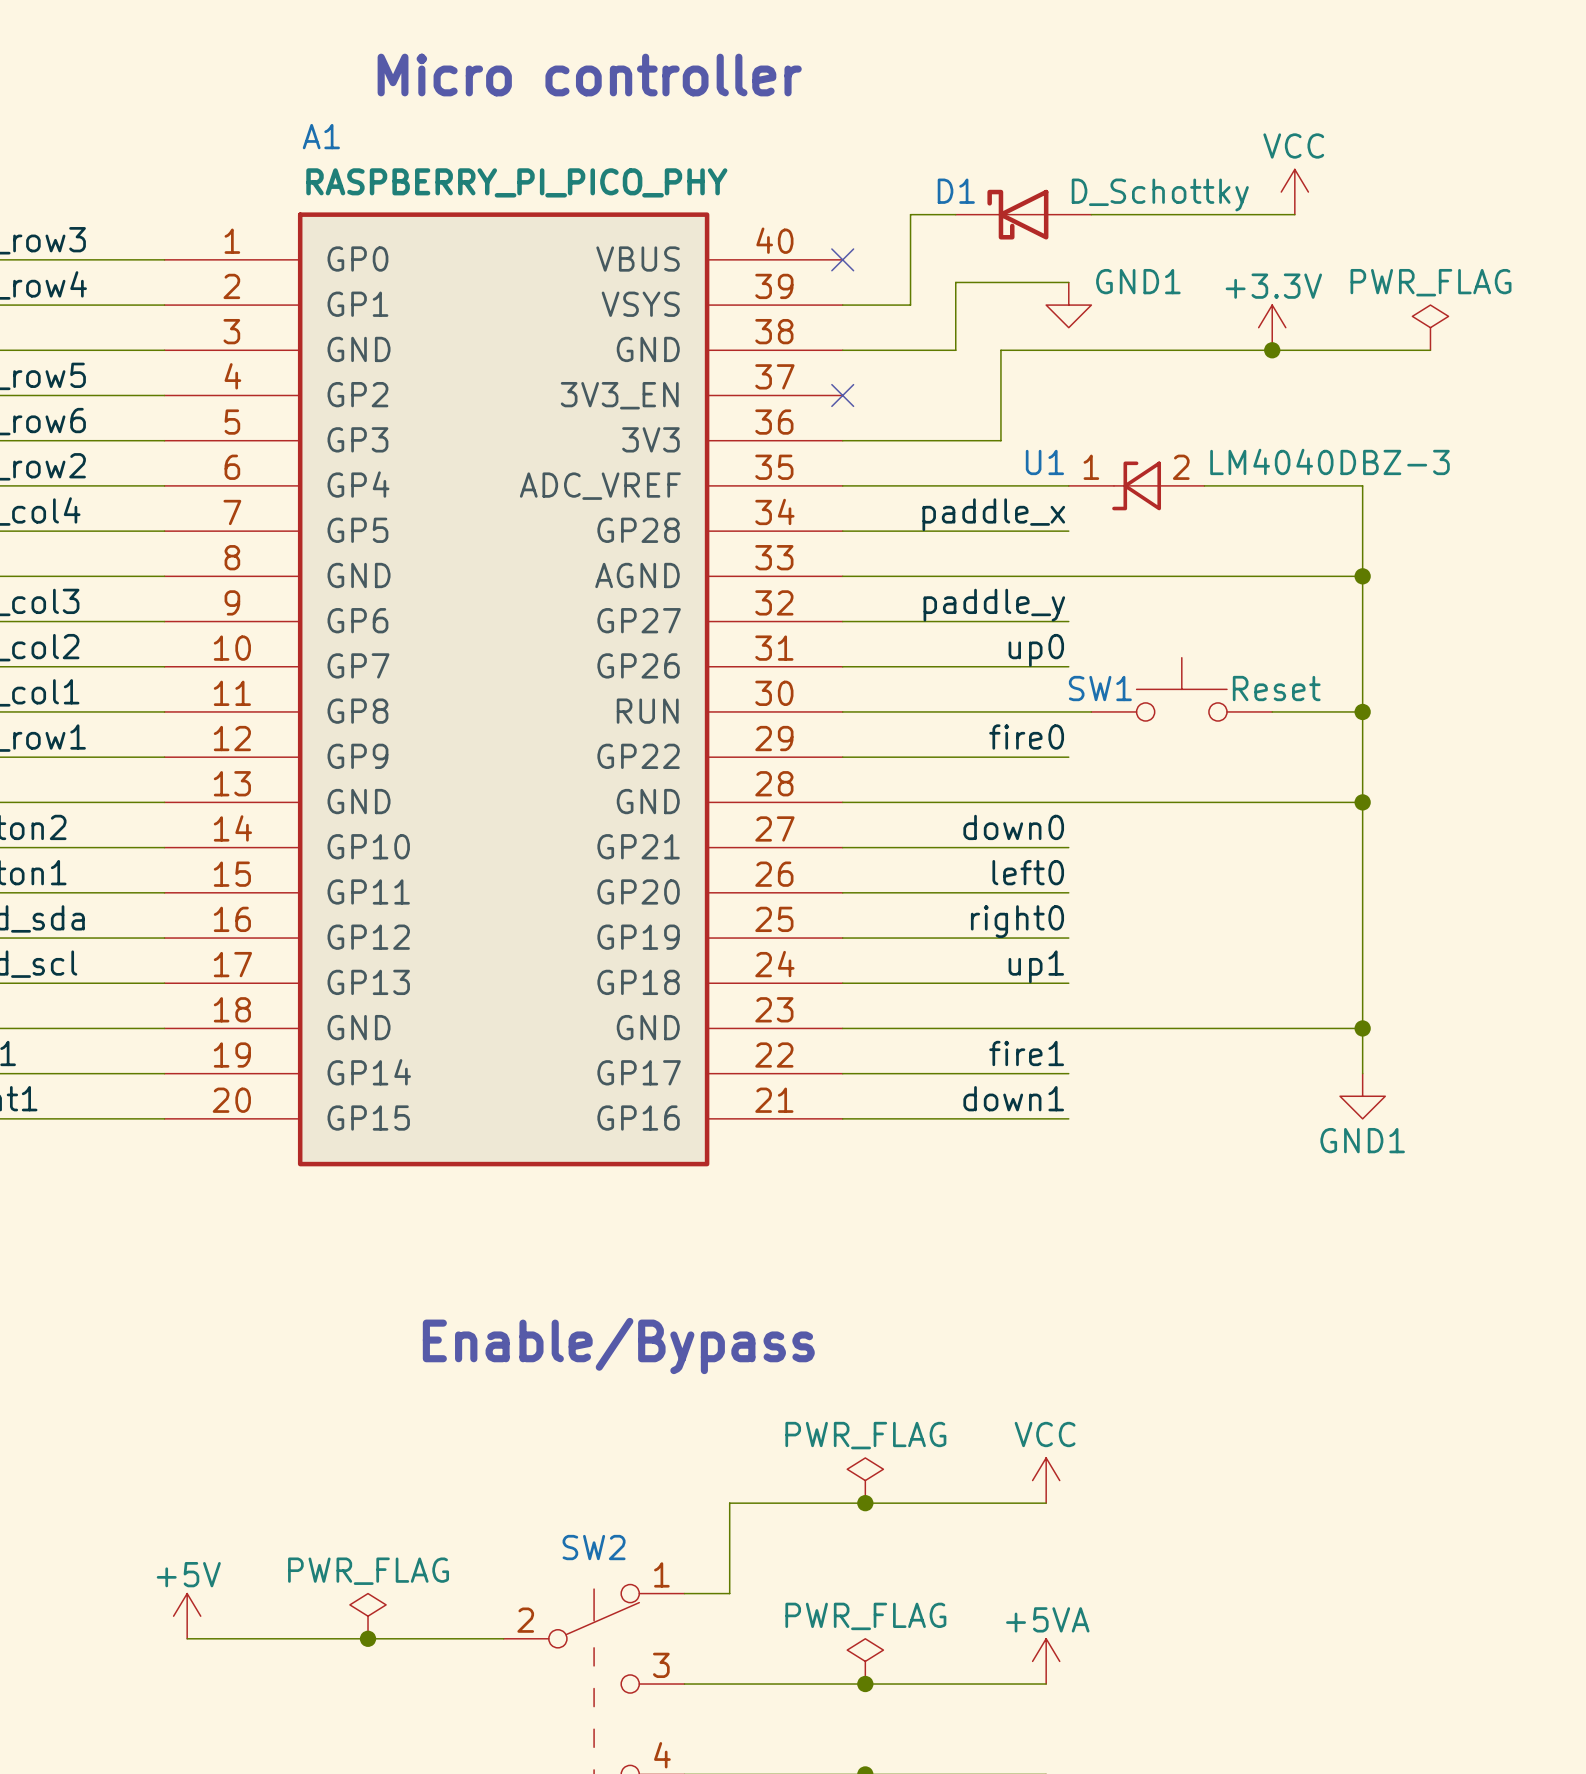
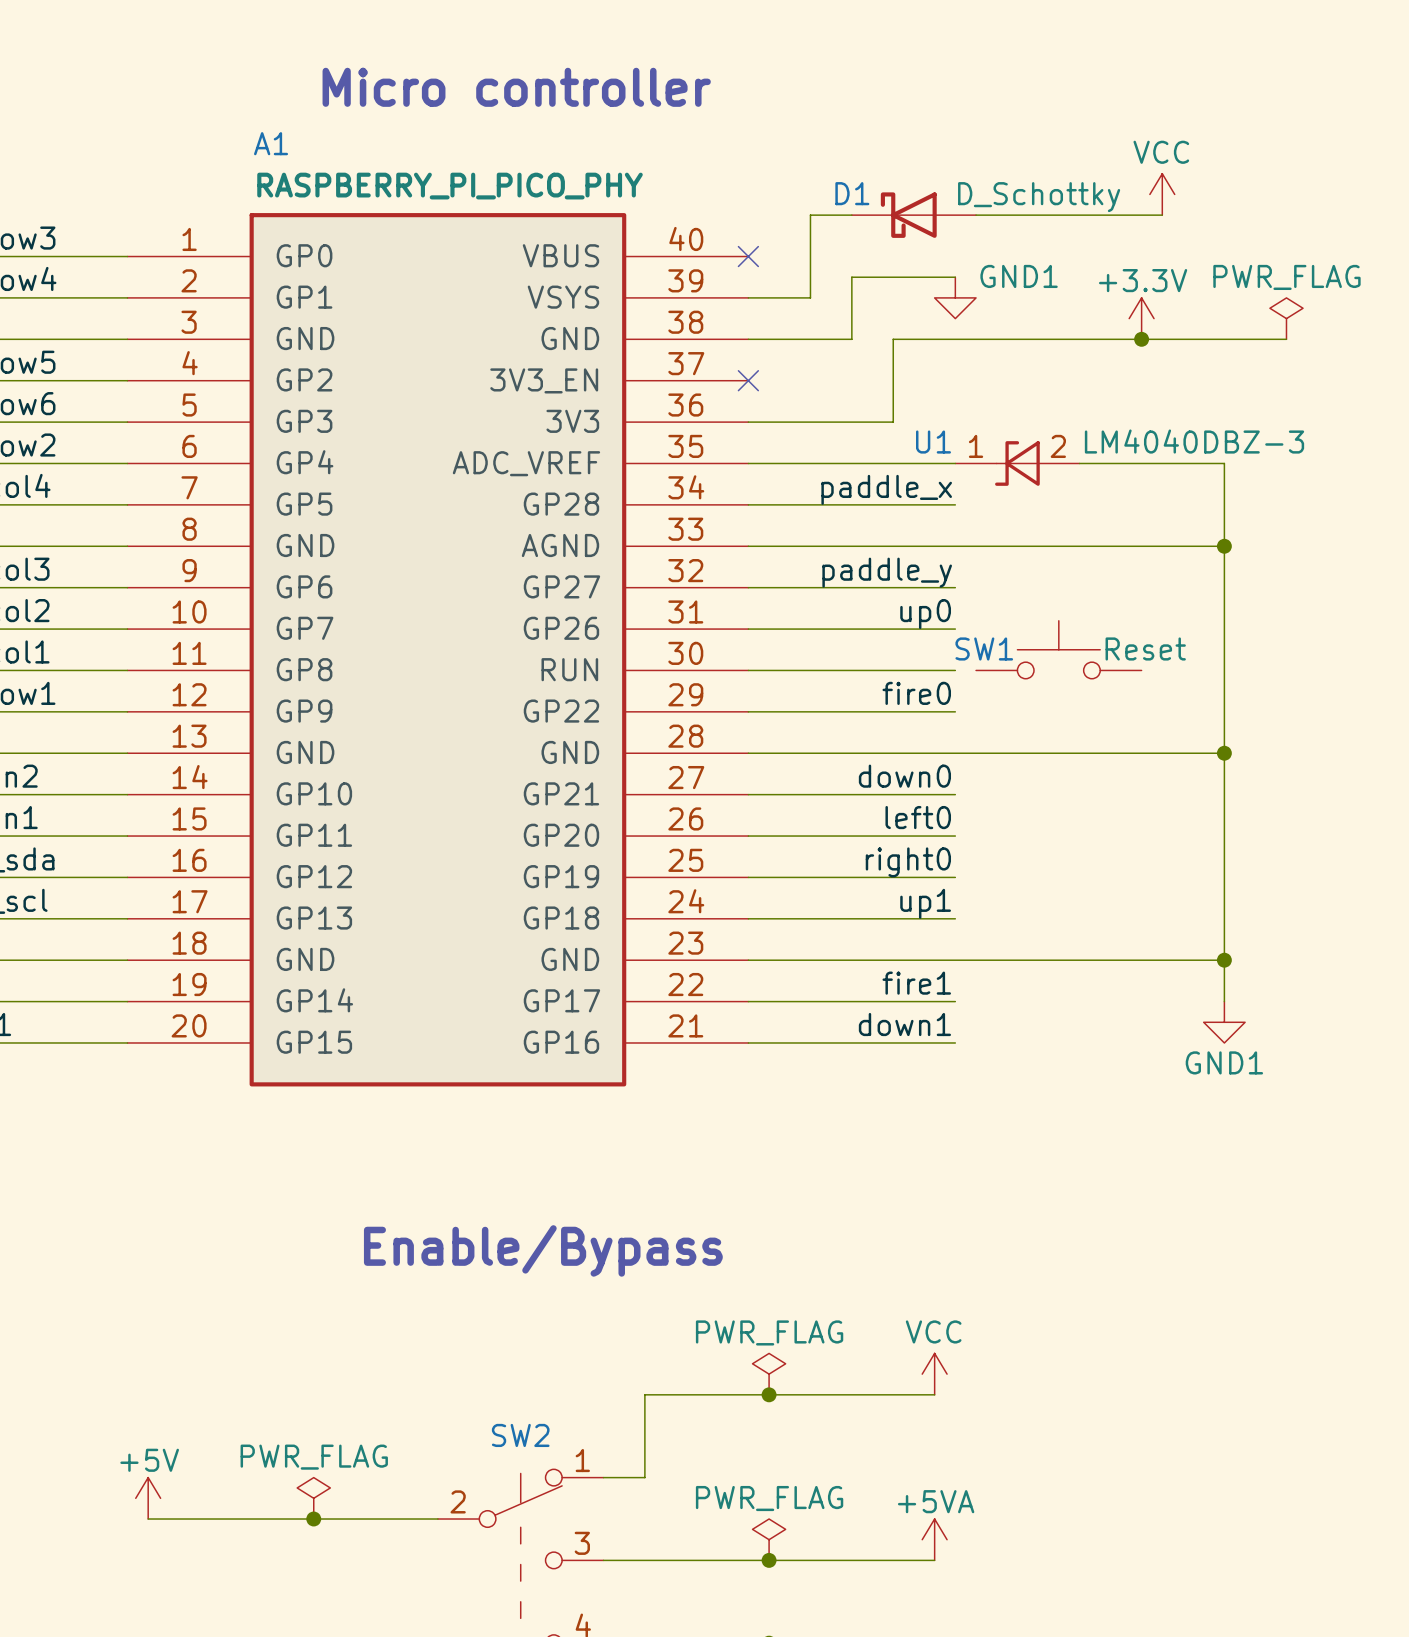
wire: (1068, 711) (1091, 711) -> none
wire: (1272, 711) (1362, 711) -> none
junction: (1362, 711) -> none

